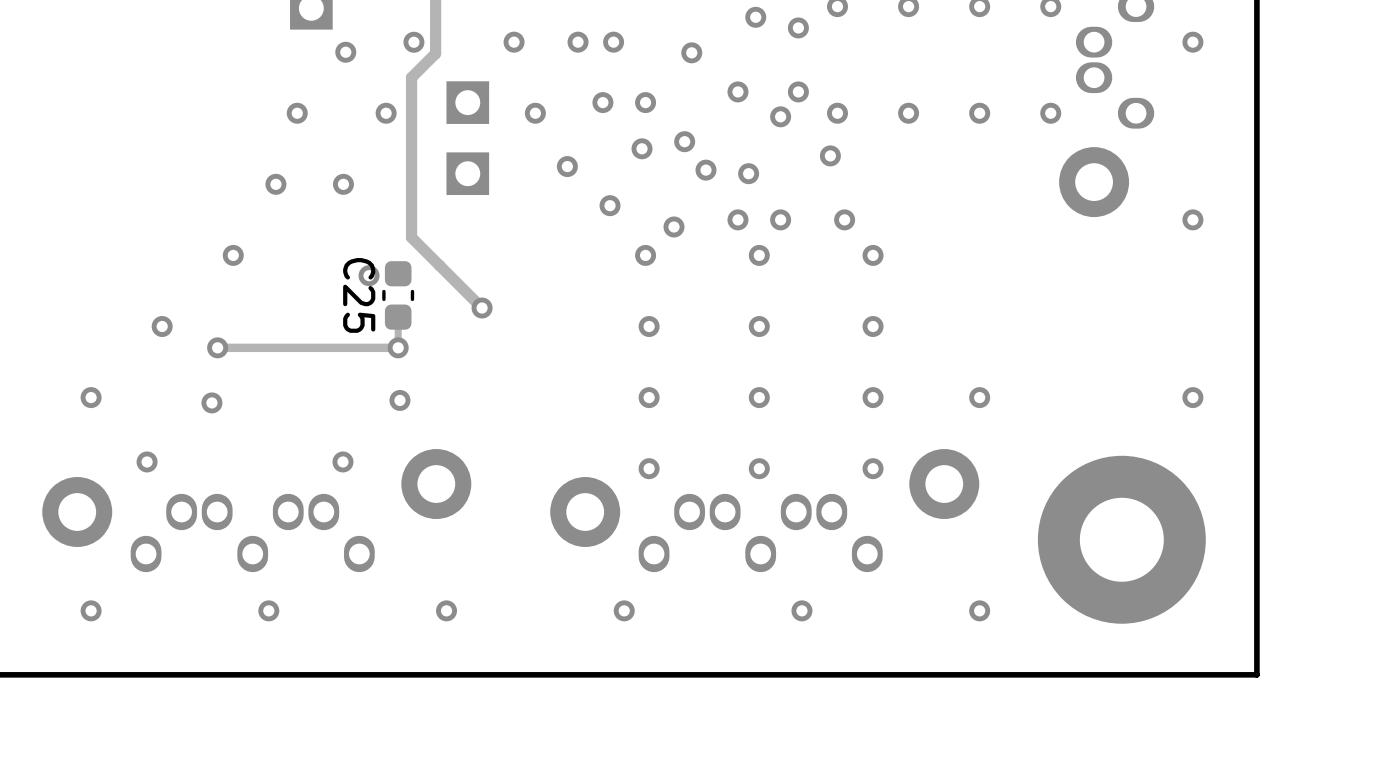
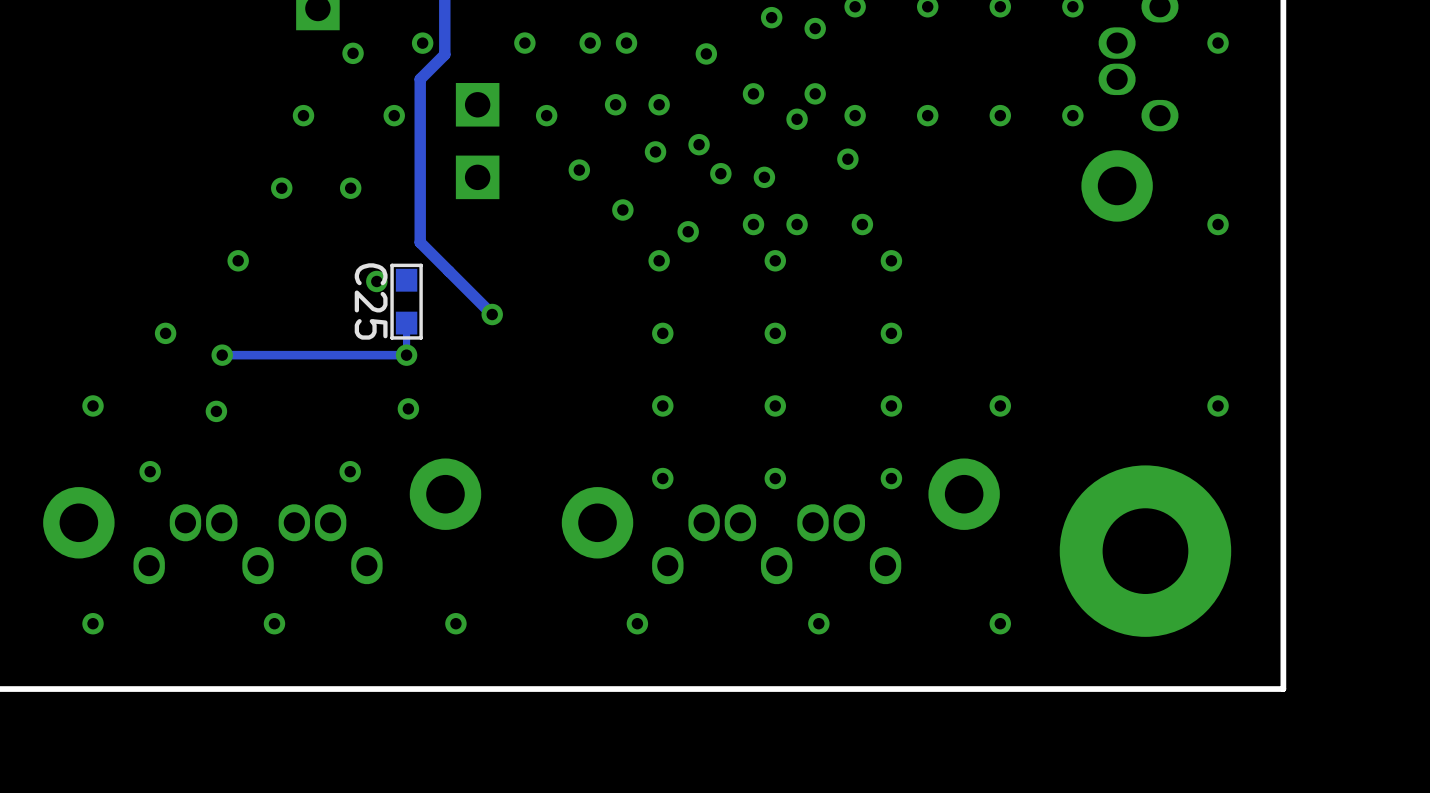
C25 footprint: [382, 261, 415, 330] -> [390, 263, 423, 340]

